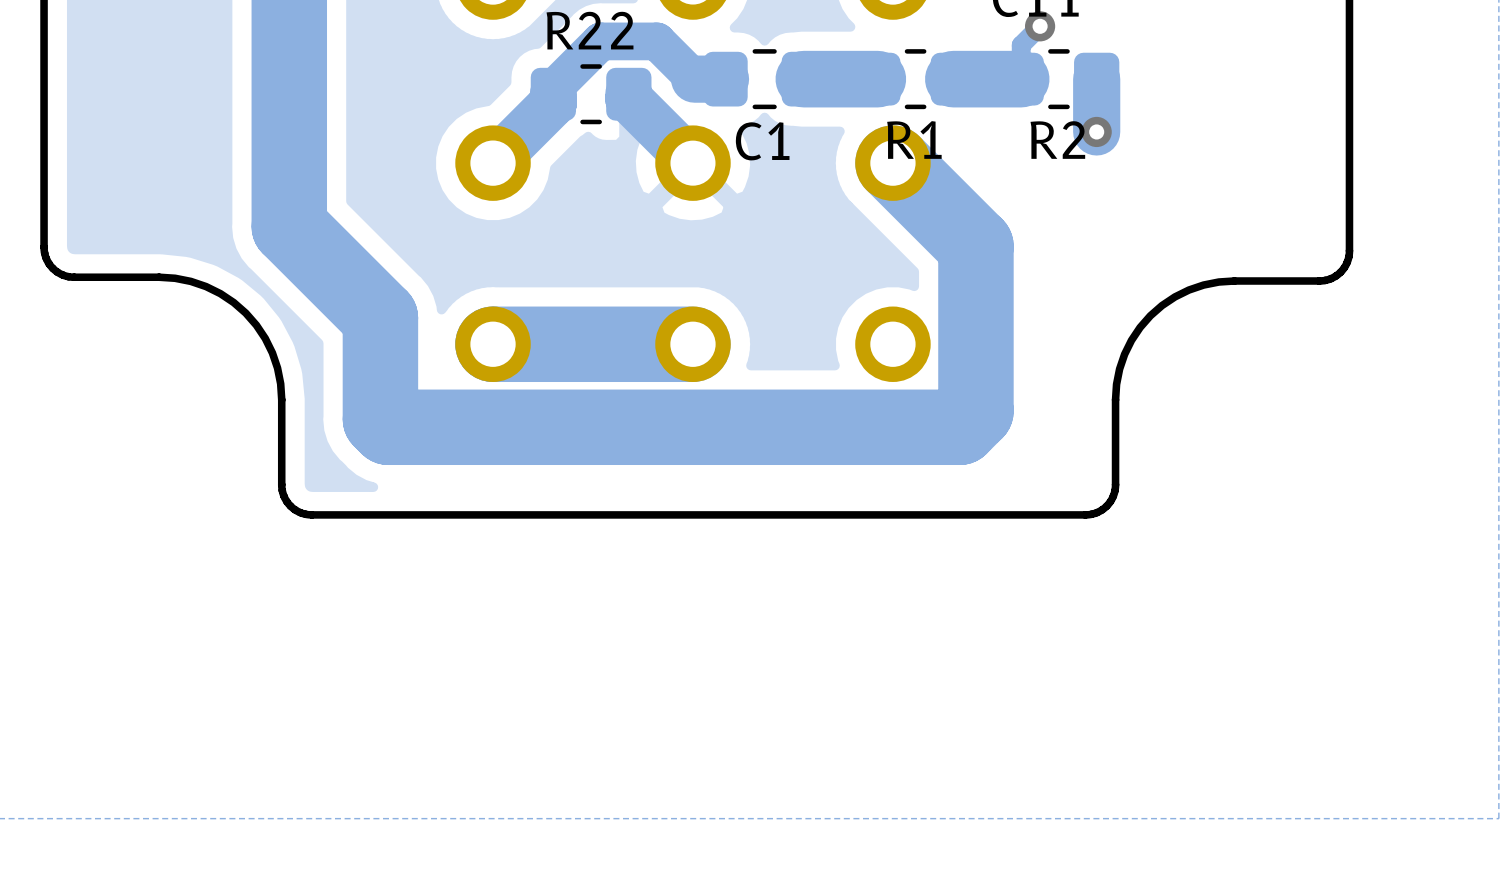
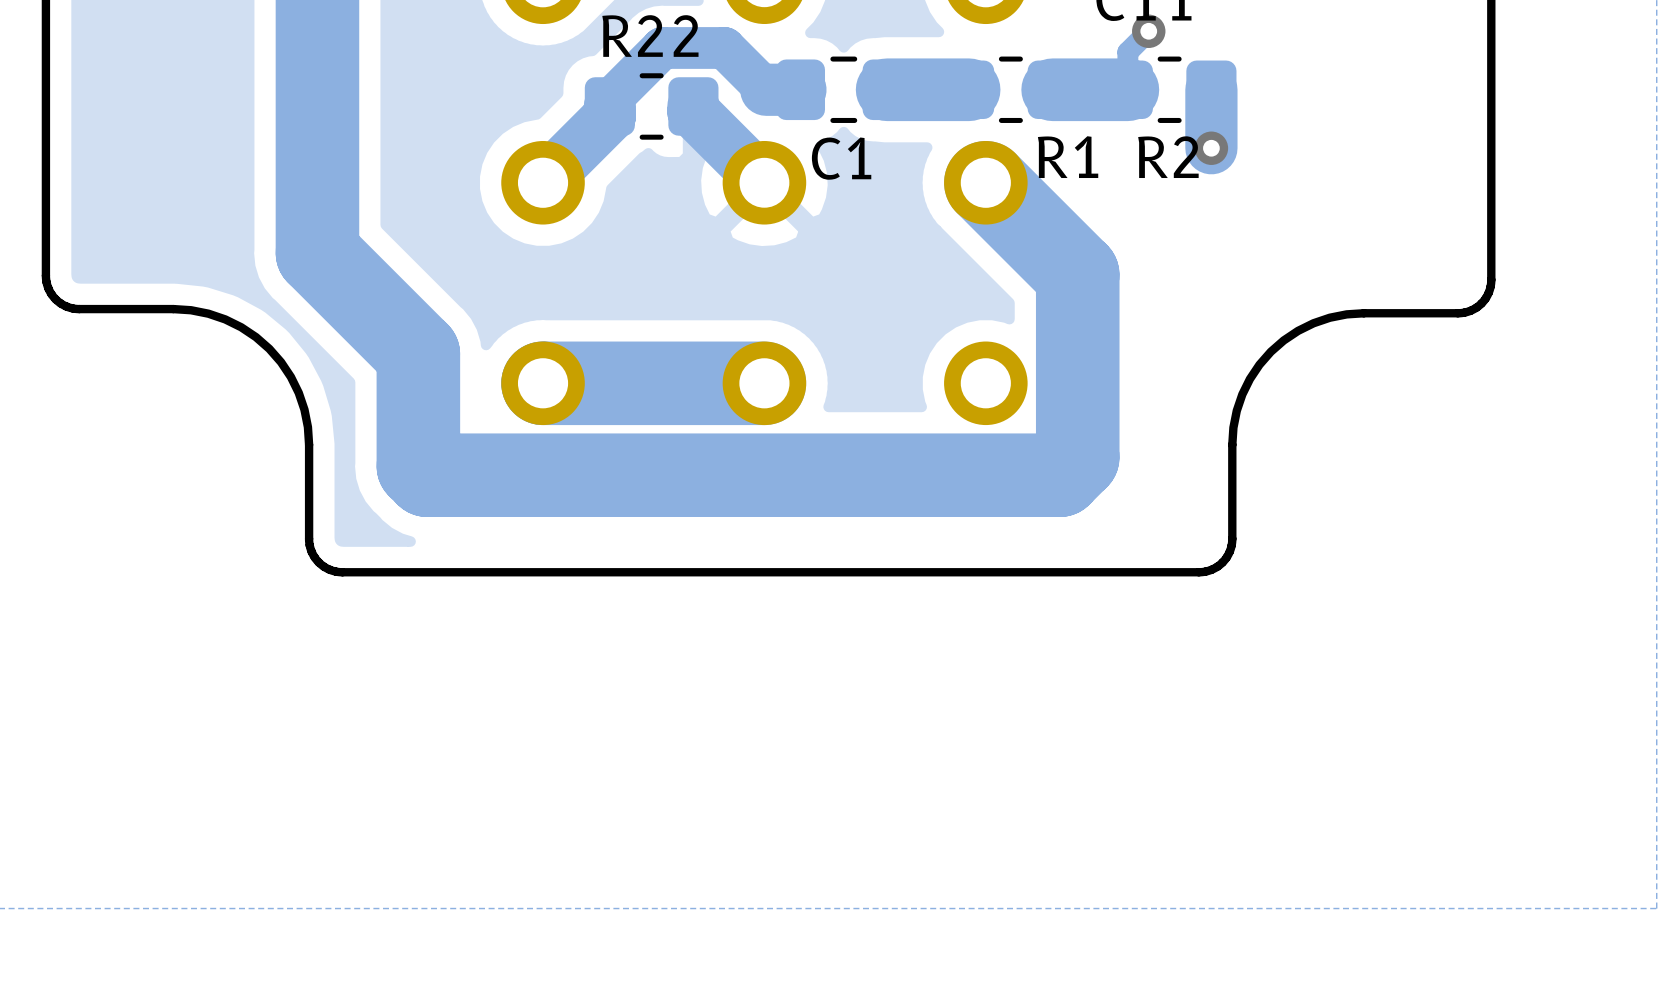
R1 name position: R1 (914, 139) -> R1 (1068, 157)

